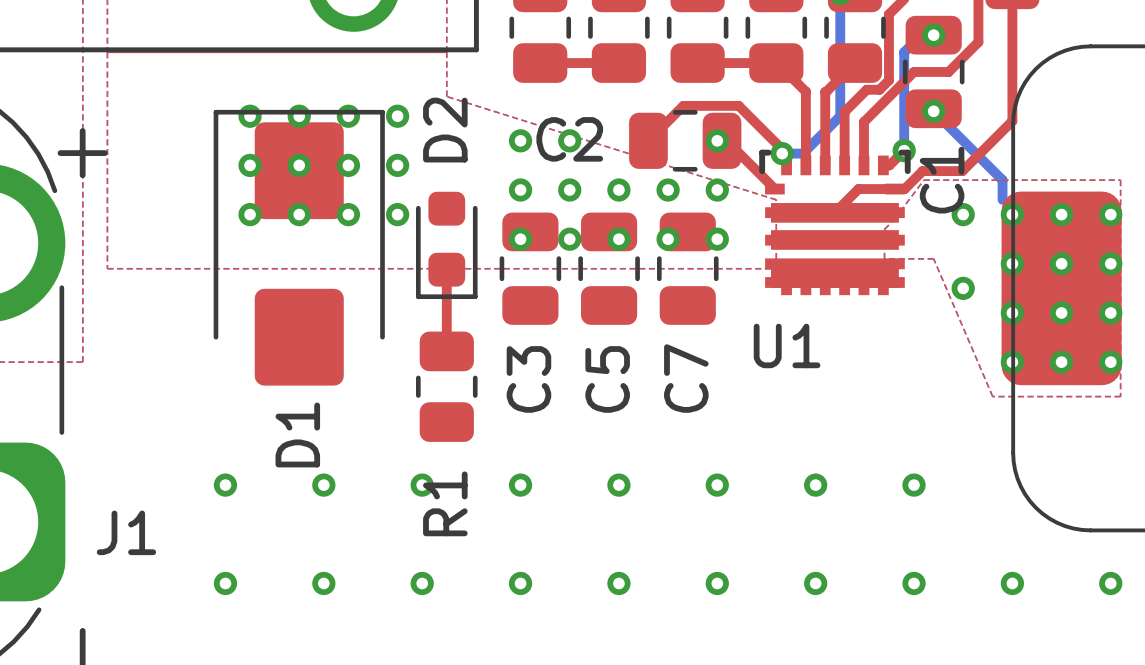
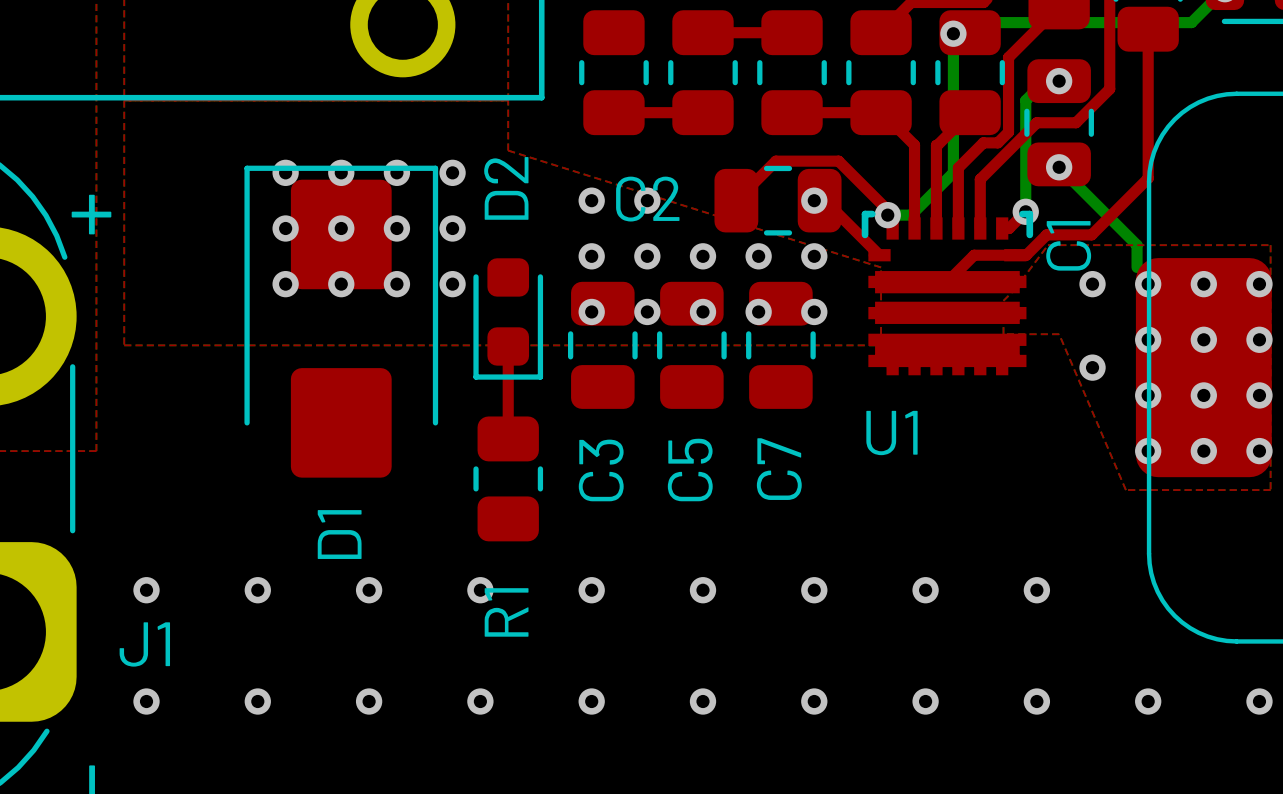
via: none -> (146, 590)
via: none -> (146, 701)

